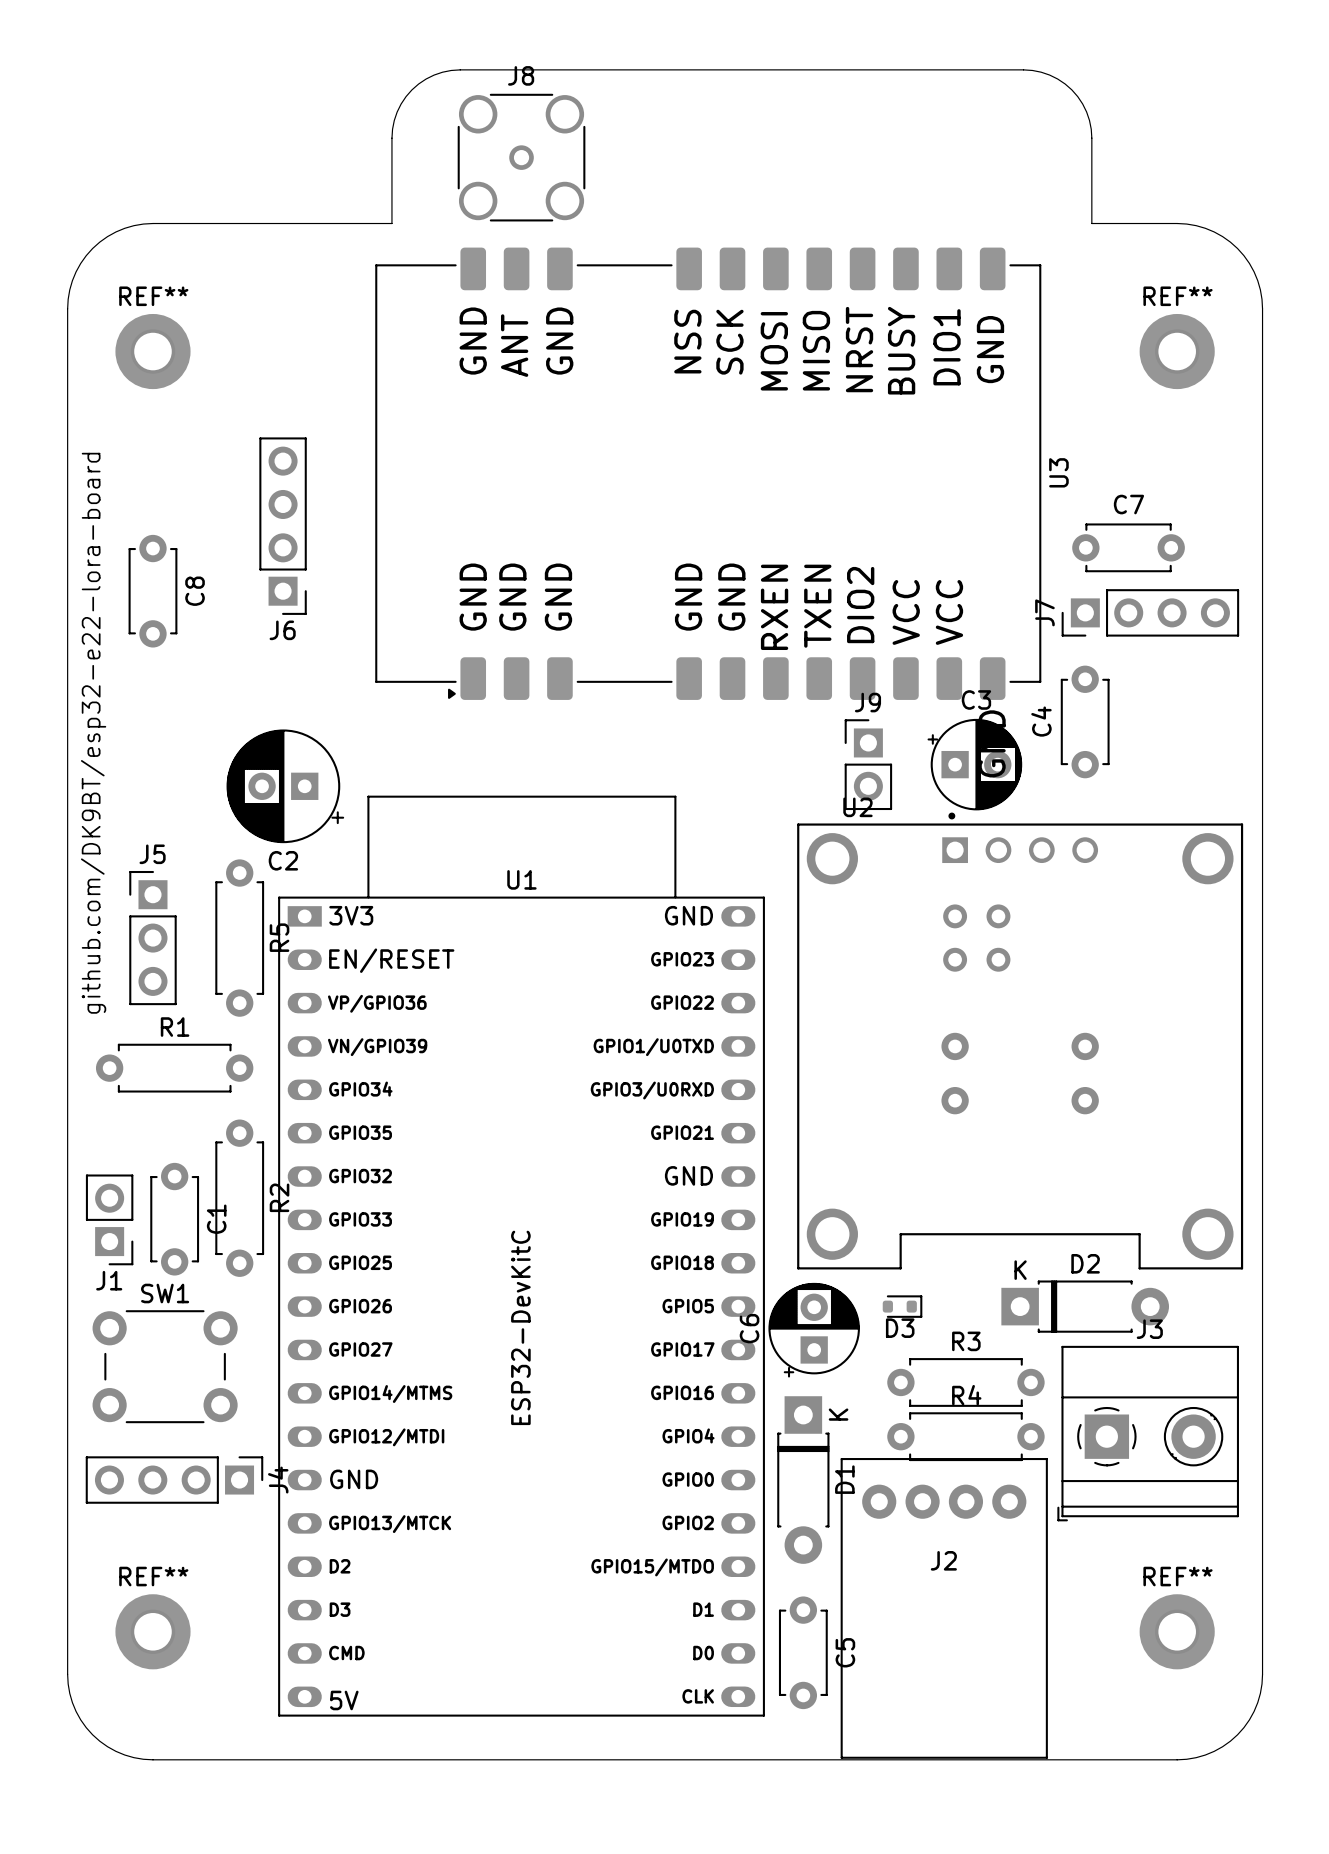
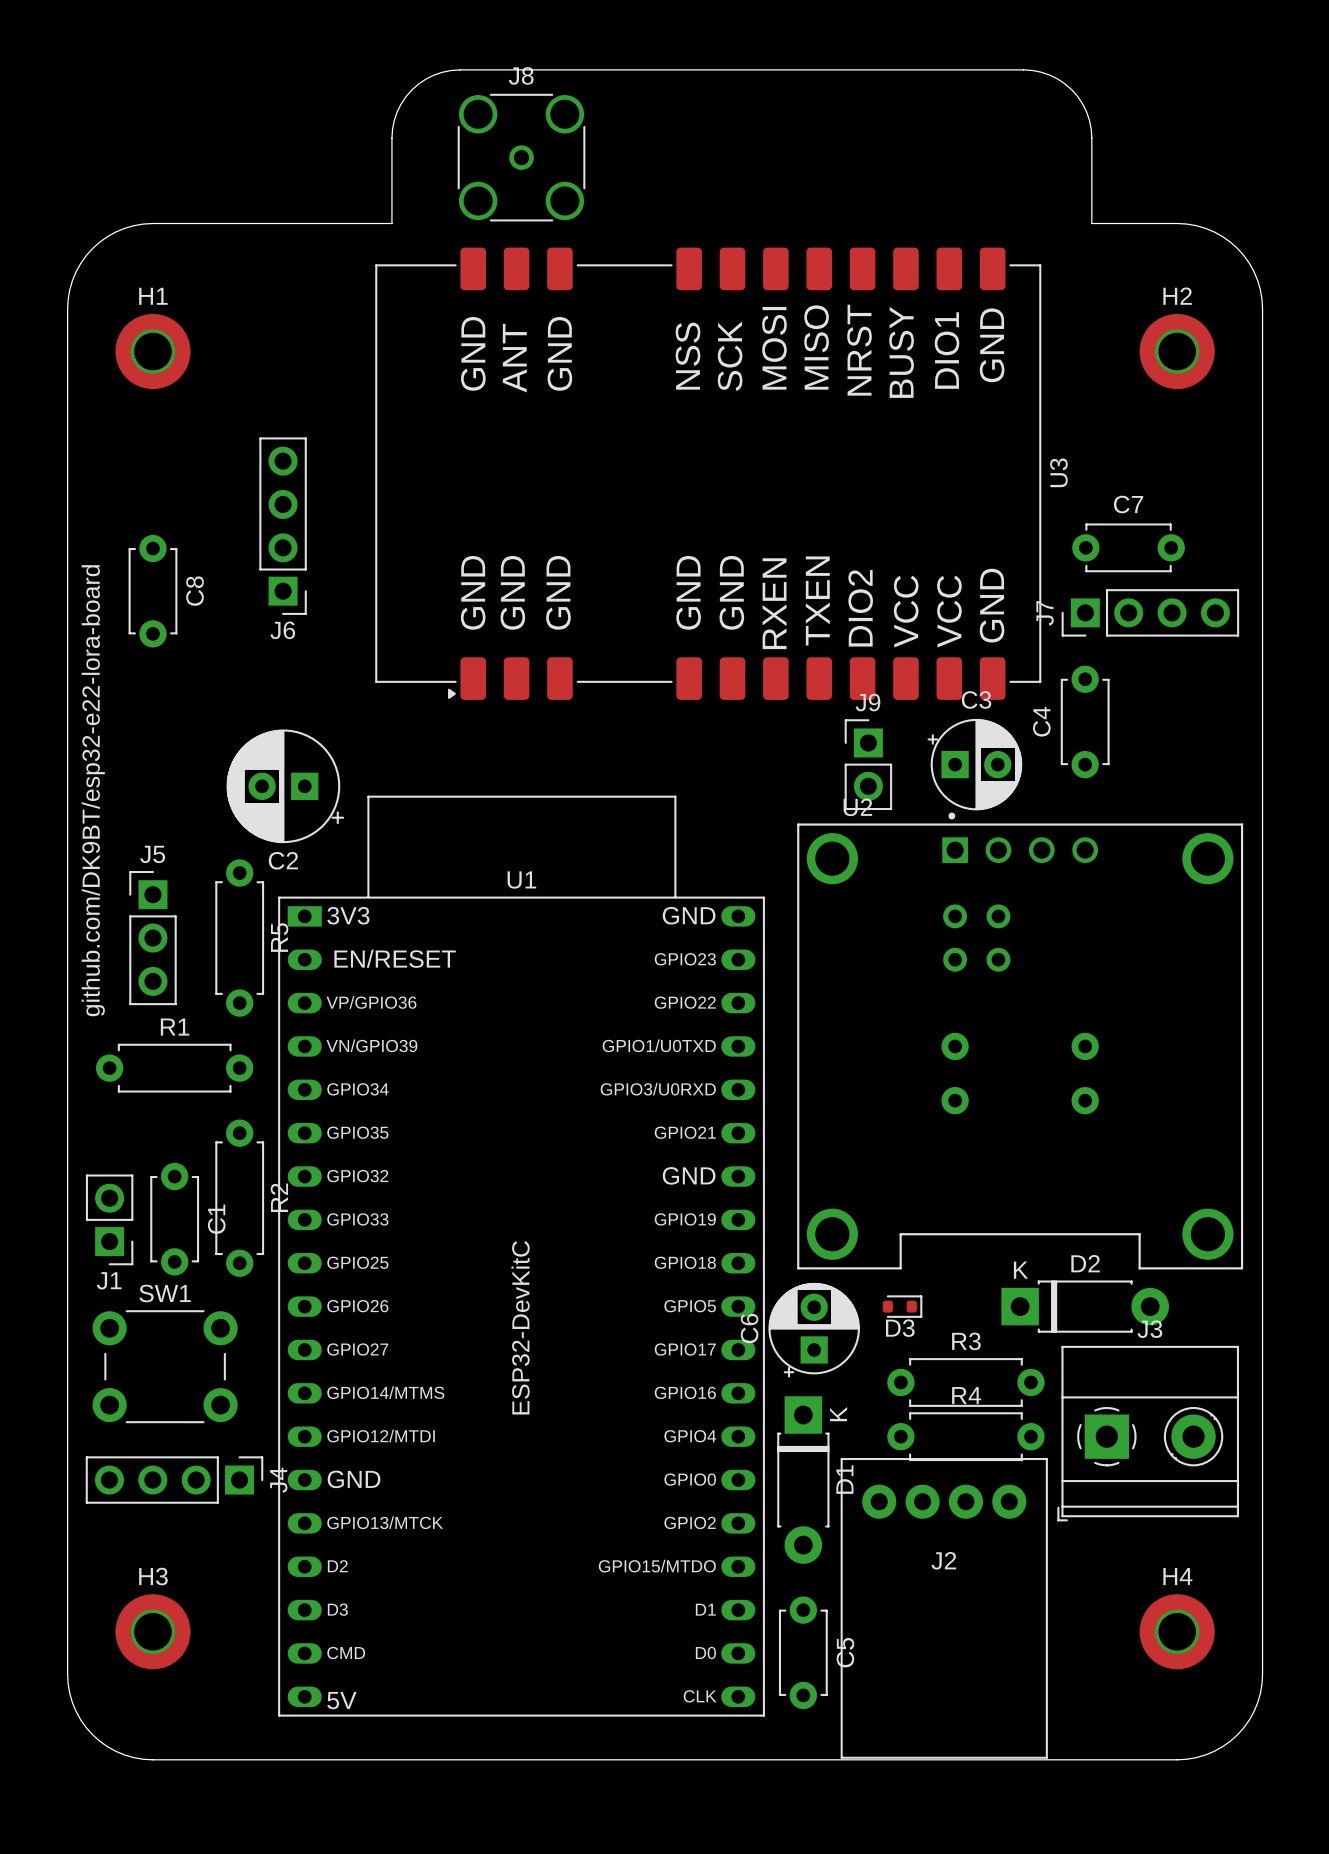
U3 footprint: [375, 247, 1042, 700] -> [375, 247, 1042, 700]
REF** name: REF** (153, 296) -> H1 (153, 296)
REF** name: REF** (1178, 296) -> H2 (1177, 296)
REF** name: REF** (153, 1576) -> H3 (153, 1576)
REF** name: REF** (1178, 1576) -> H4 (1177, 1576)

